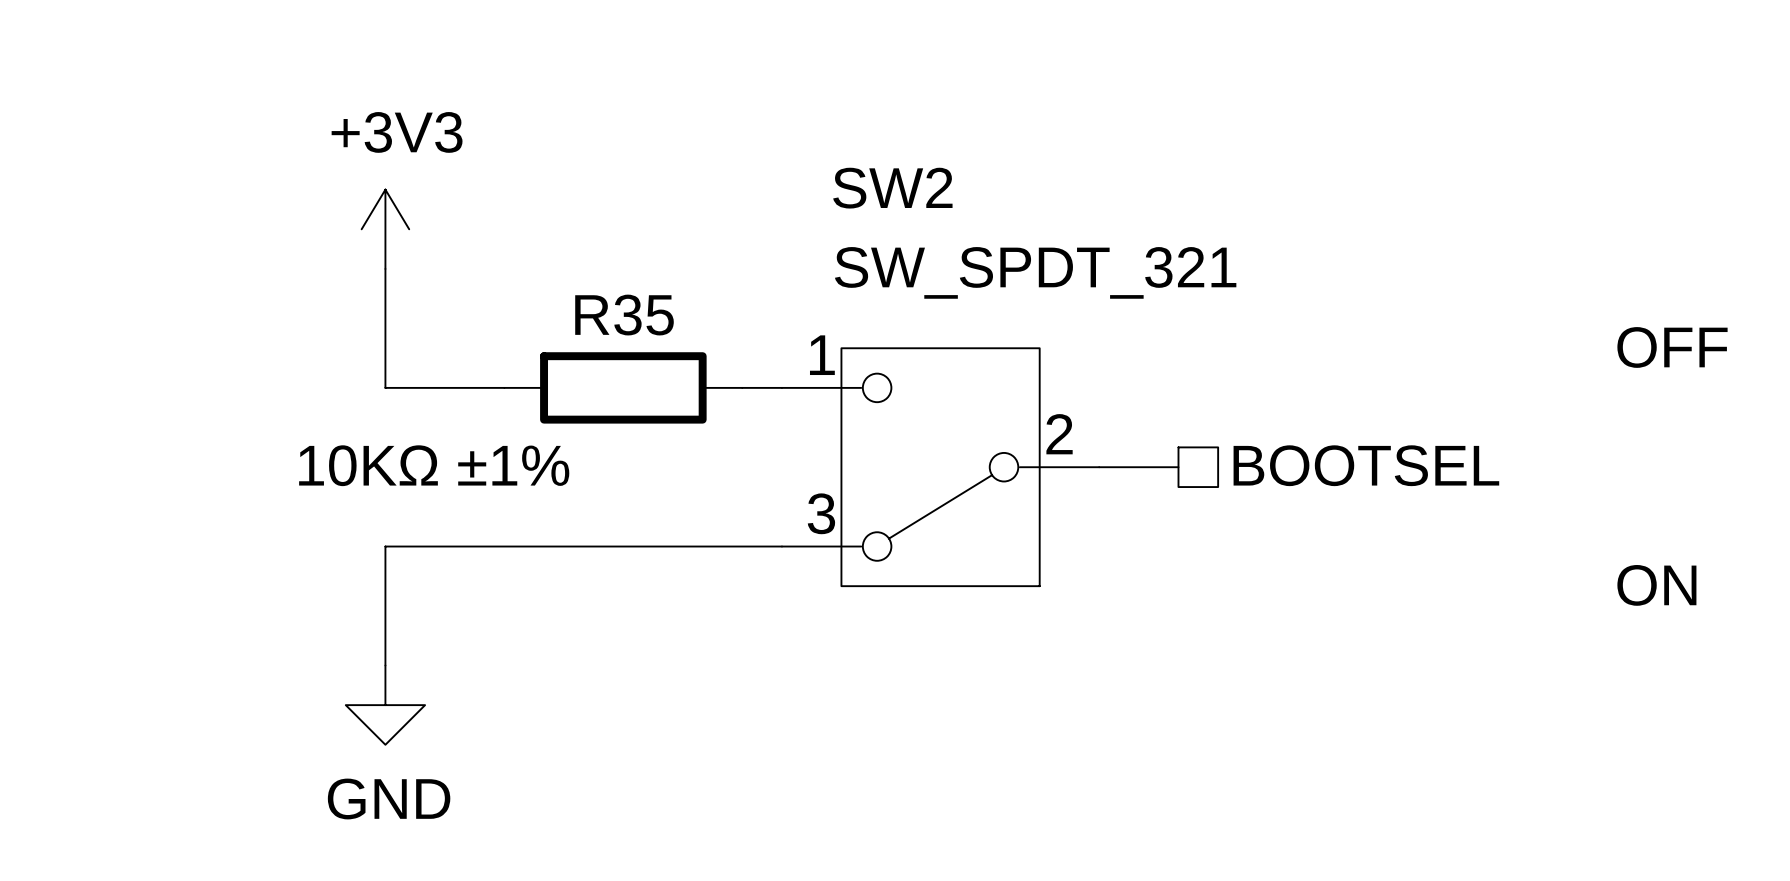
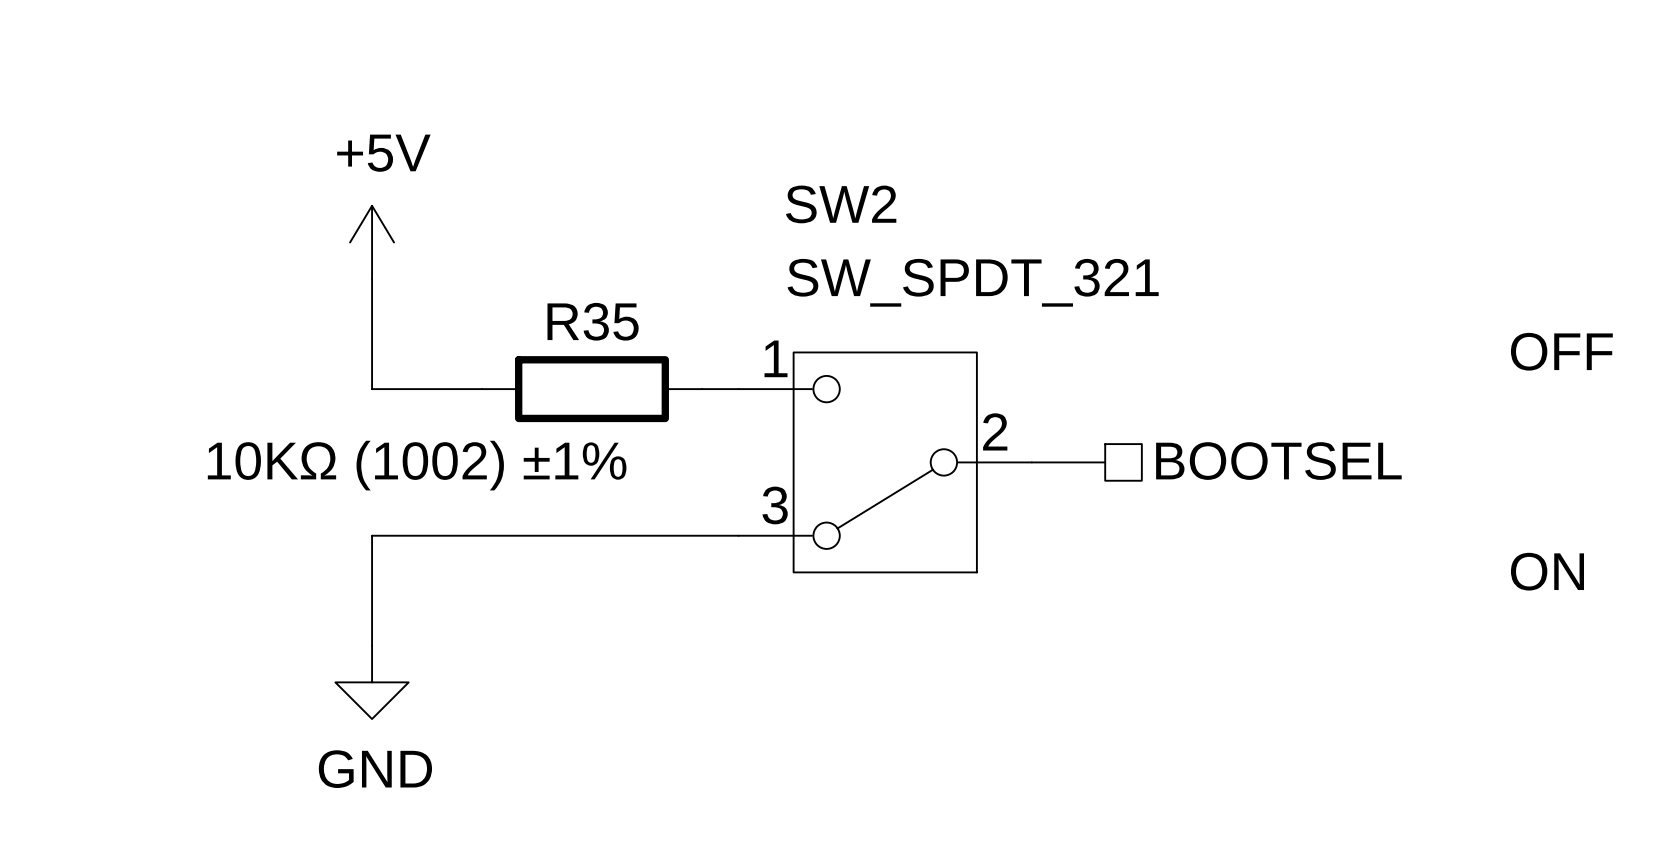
power symbol: +3V3 (385, 229) -> +5V (372, 242)
R35 value: 10KΩ ±1% (434, 465) -> 10KΩ (1002) ±1% (417, 465)

